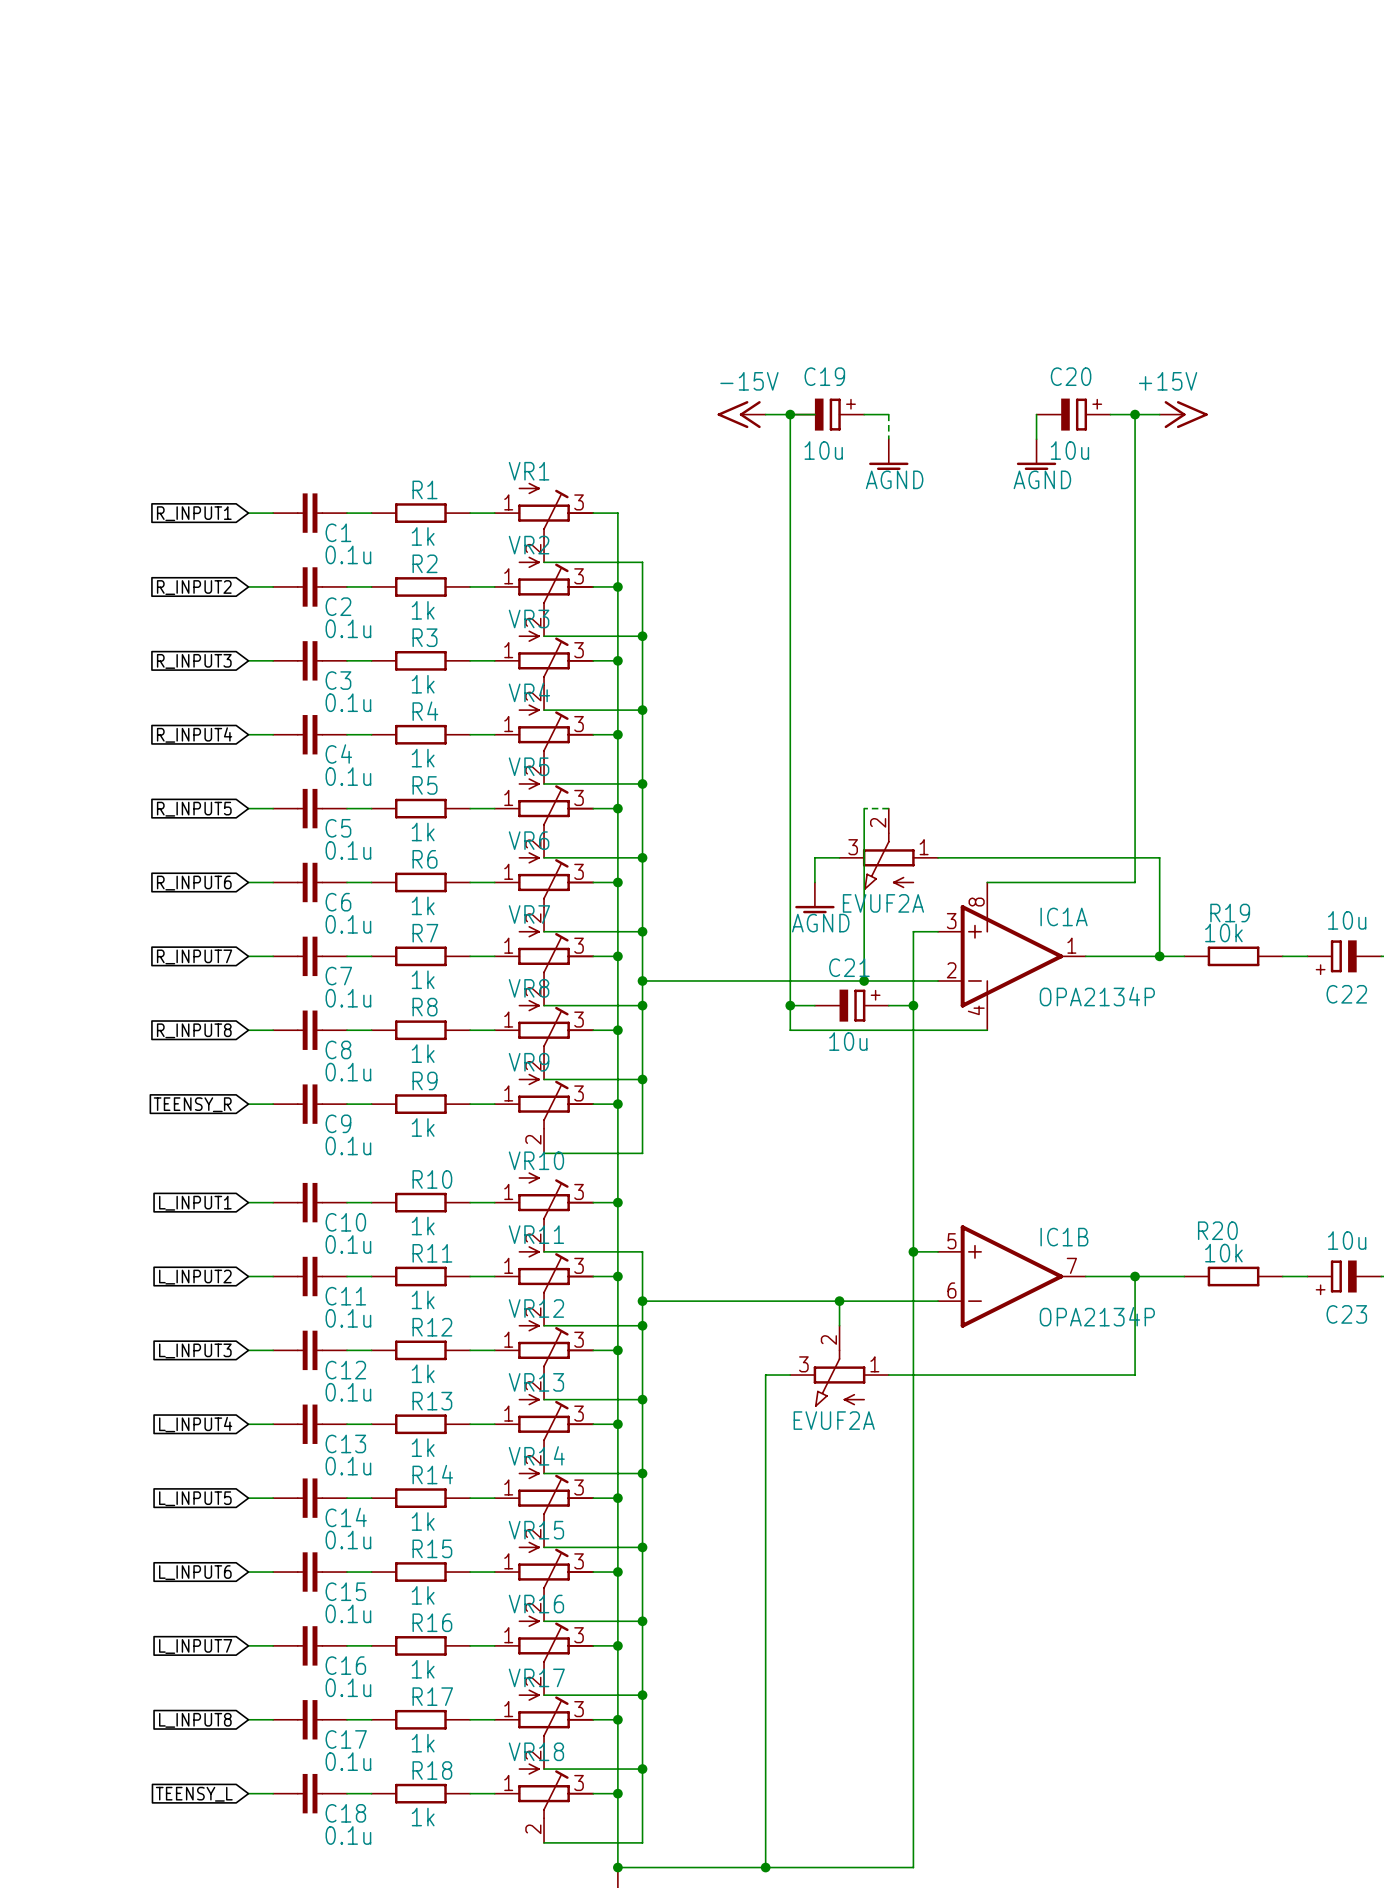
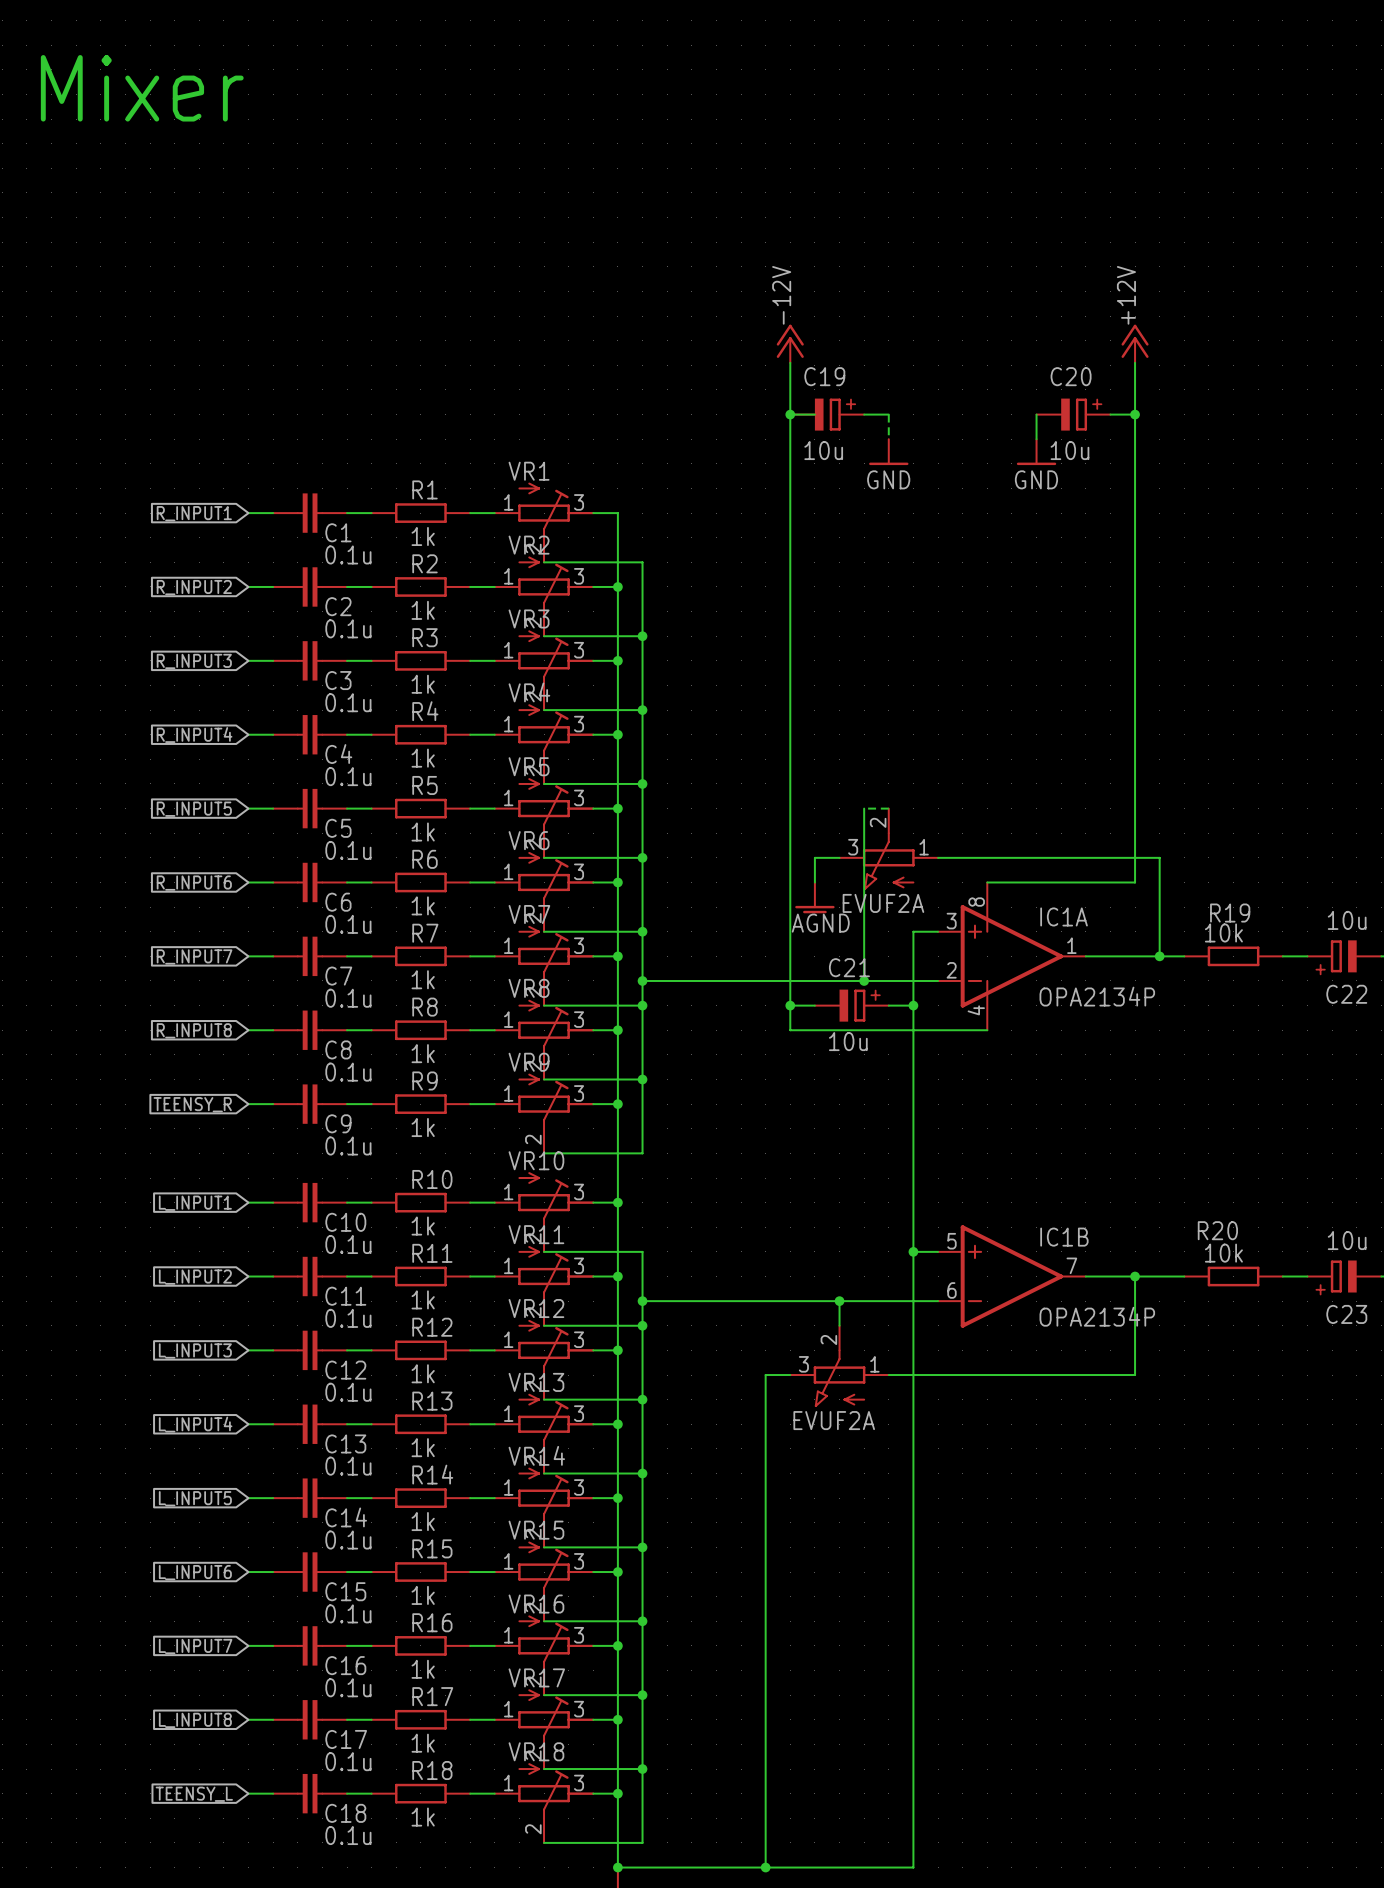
text: none -> Mixer (142, 88)
power symbol: none -> -12V (790, 343)
power symbol: none -> +12V (1135, 343)
power symbol: -15V (741, 414) -> none
wire: (765, 414) (790, 414) -> (790, 362) (790, 414)
wire: (1135, 414) (1159, 414) -> (1135, 414) (1135, 362)
power symbol: +15V (1183, 414) -> none
power symbol: AGND (888, 454) -> GND (888, 452)
power symbol: AGND (1036, 454) -> GND (1036, 452)

